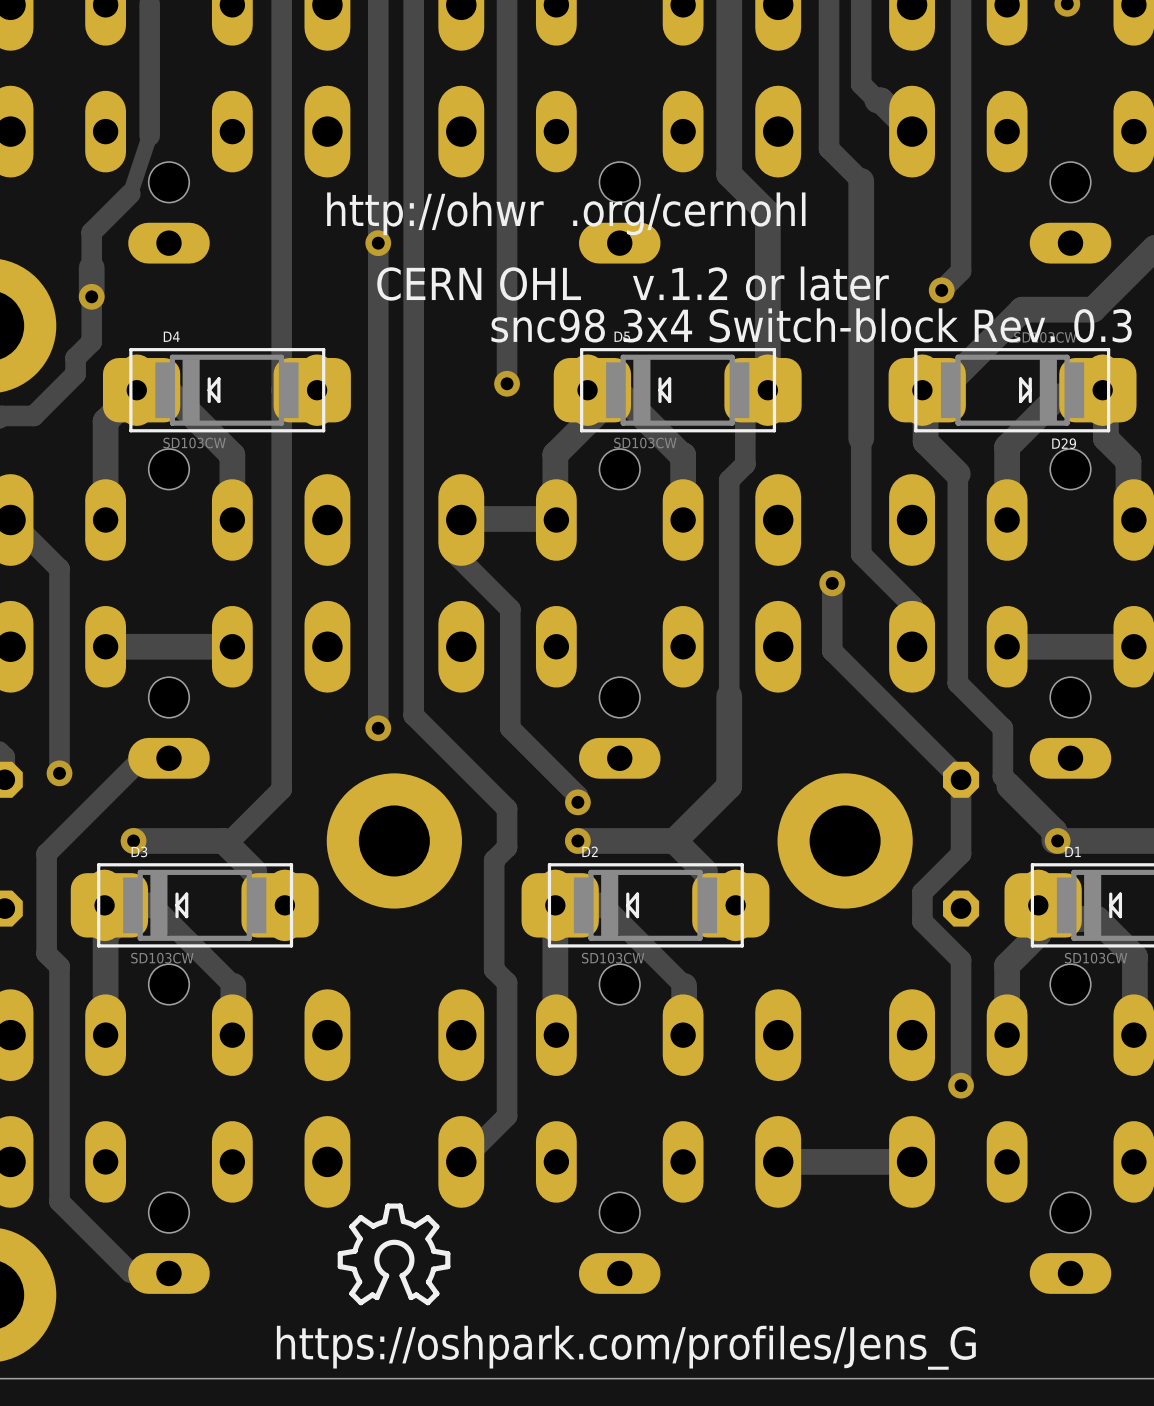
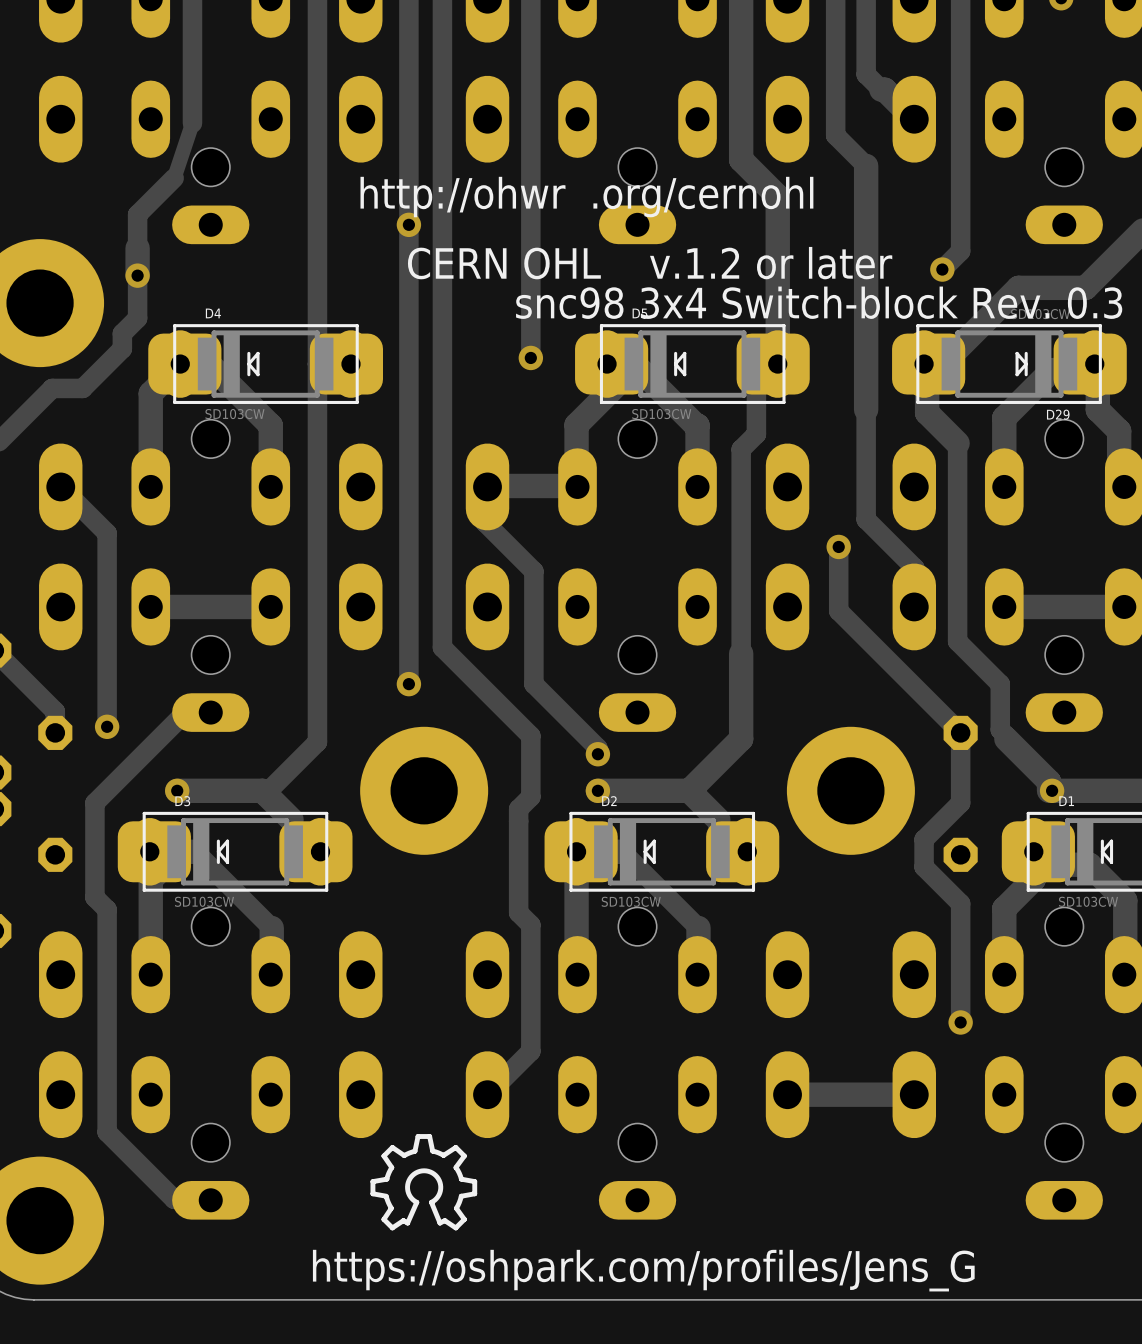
track: (413, 689) (413, 715) (507, 808) -> (442, 647) (530, 735) (530, 760)

